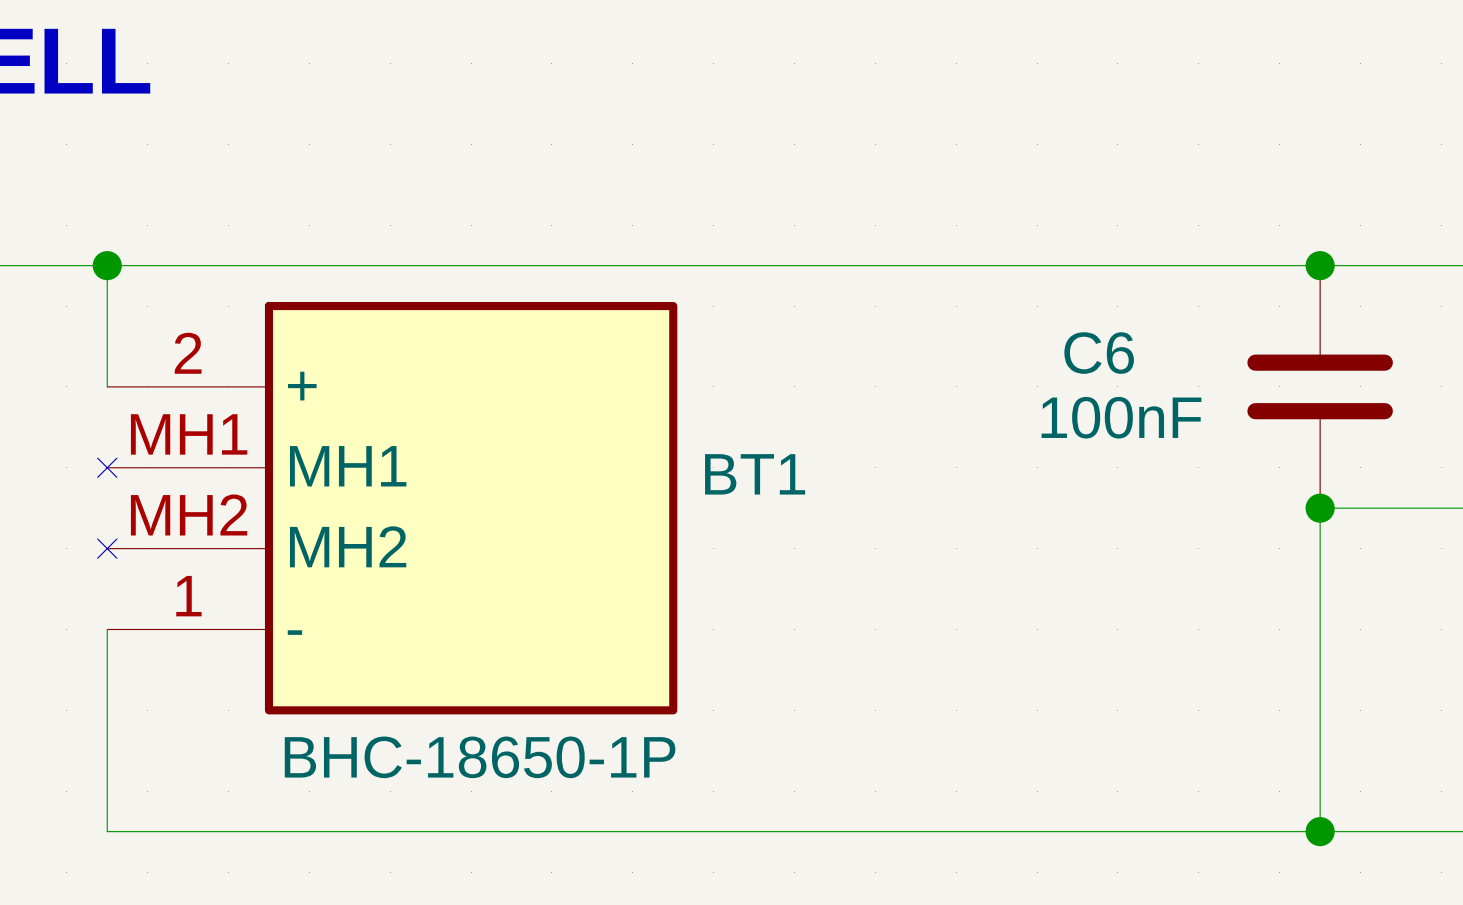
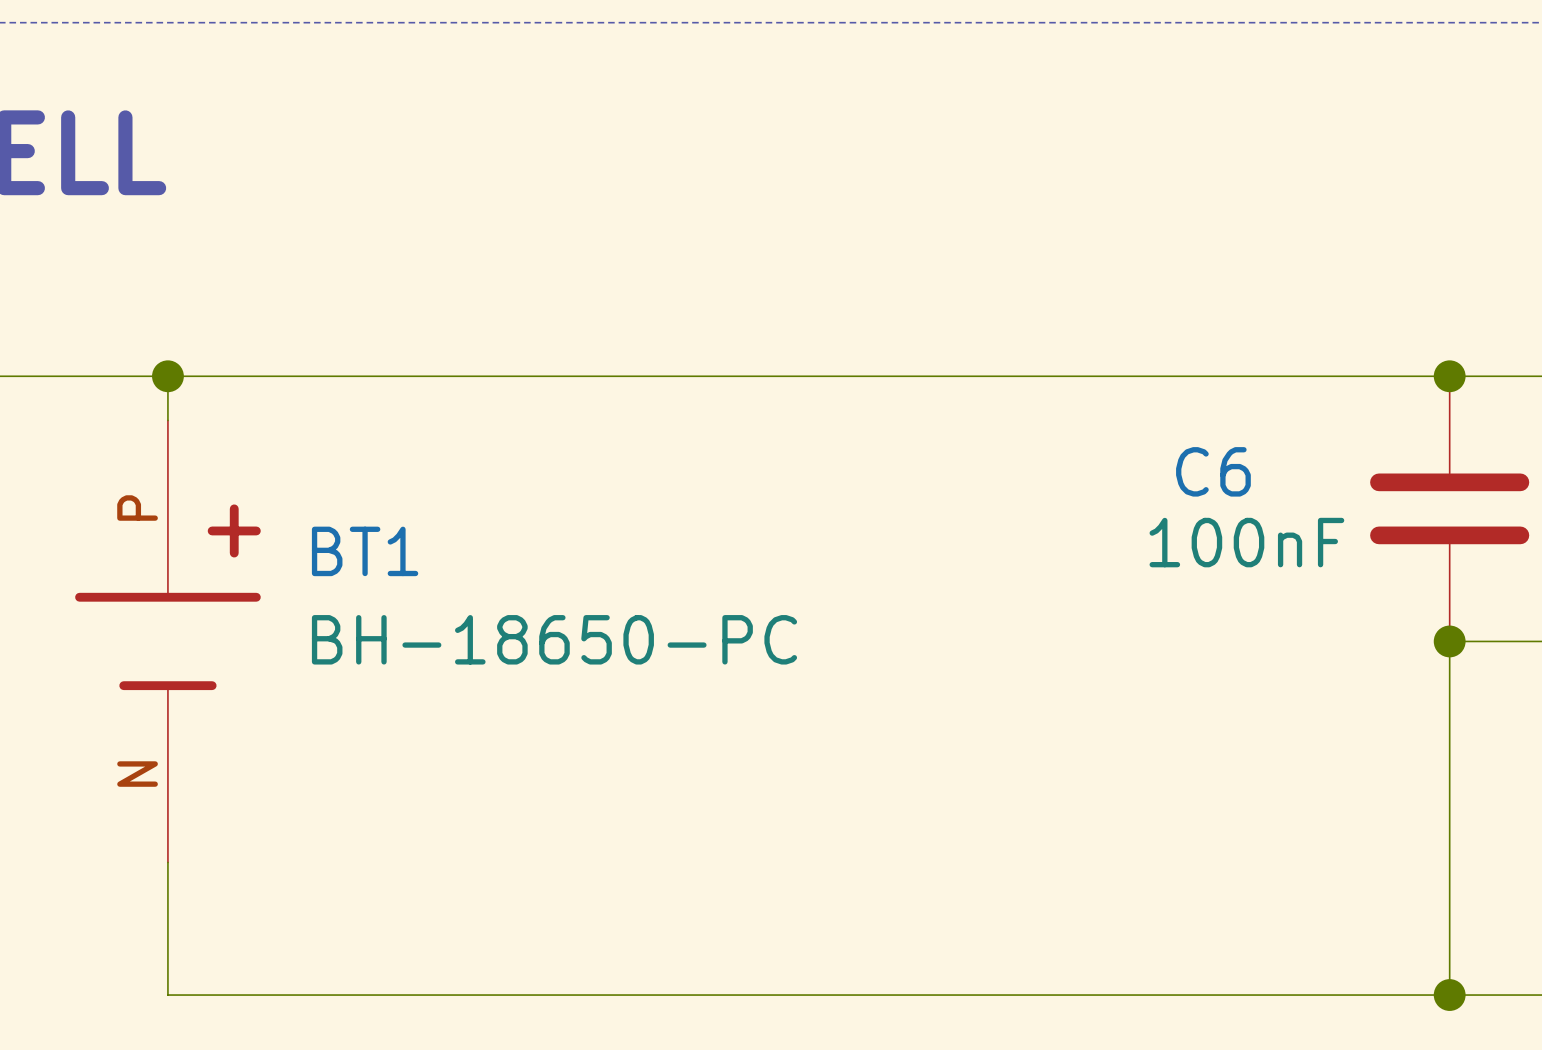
wire: (107, 265) (107, 386) -> none
junction position: (107, 265) -> (167, 376)
wire: none -> (167, 376) (167, 420)
BT1 symbol: [97, 302, 678, 715] -> [75, 420, 261, 863]
BT1 name position: BT1 (755, 474) -> BT1 (365, 551)
wire: (107, 629) (107, 831) (147, 831) -> (167, 862) (167, 995)
BT1 value: BHC-18650-1P (480, 757) -> BH-18650-PC (554, 639)

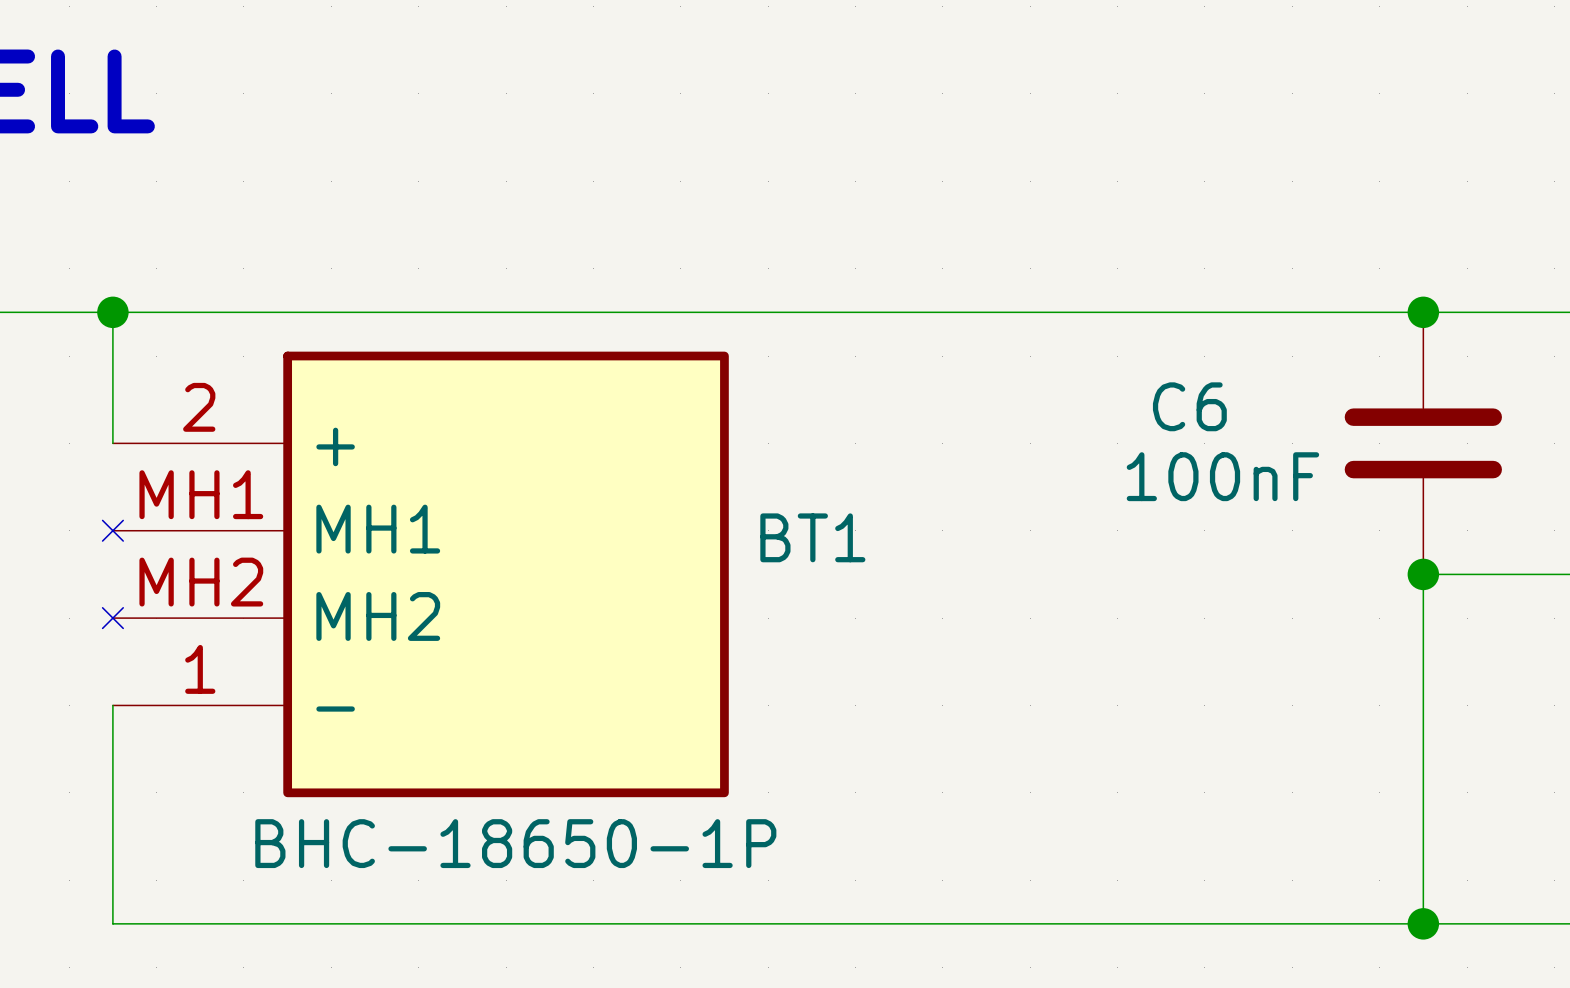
wire: none -> (112, 312) (112, 443)
wire: (167, 376) (167, 420) -> none
junction position: (167, 376) -> (112, 312)
BT1 symbol: [75, 420, 261, 863] -> [102, 351, 729, 798]
BT1 name position: BT1 (365, 551) -> BT1 (812, 537)
BT1 value: BH-18650-PC (554, 639) -> BHC-18650-1P (515, 843)
wire: (167, 862) (167, 995) -> (112, 705) (112, 923) (156, 923)

